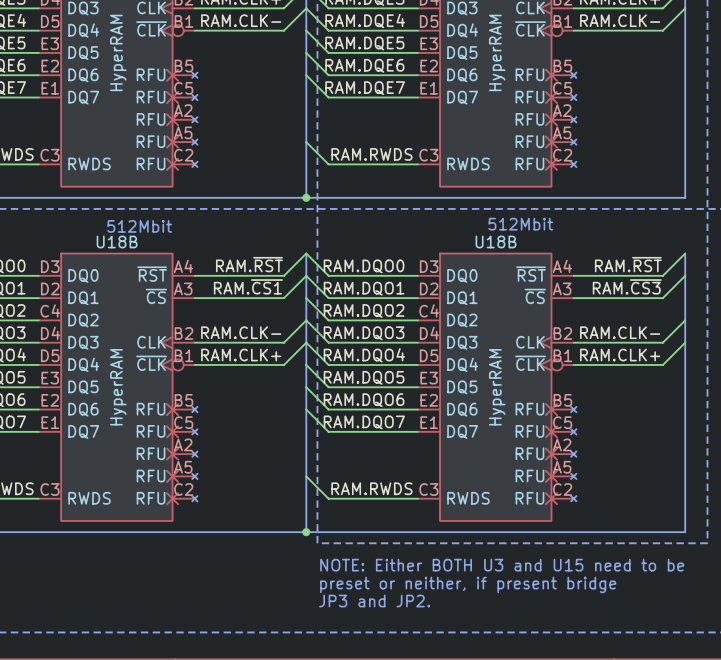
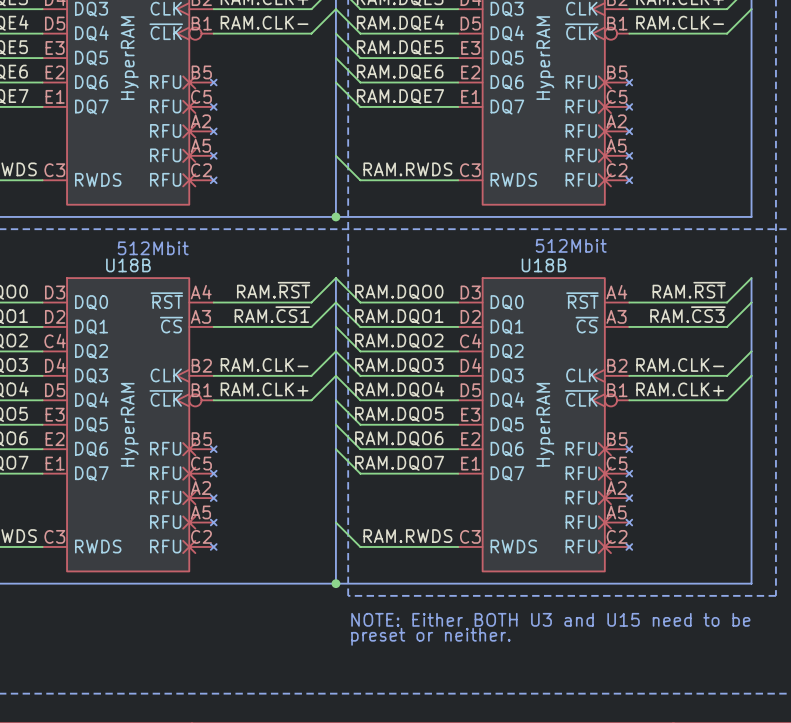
text: preset or neither, if present bridge (468, 584) -> preset or neither. (430, 636)
text: JP3 and JP2. (374, 601) -> none

